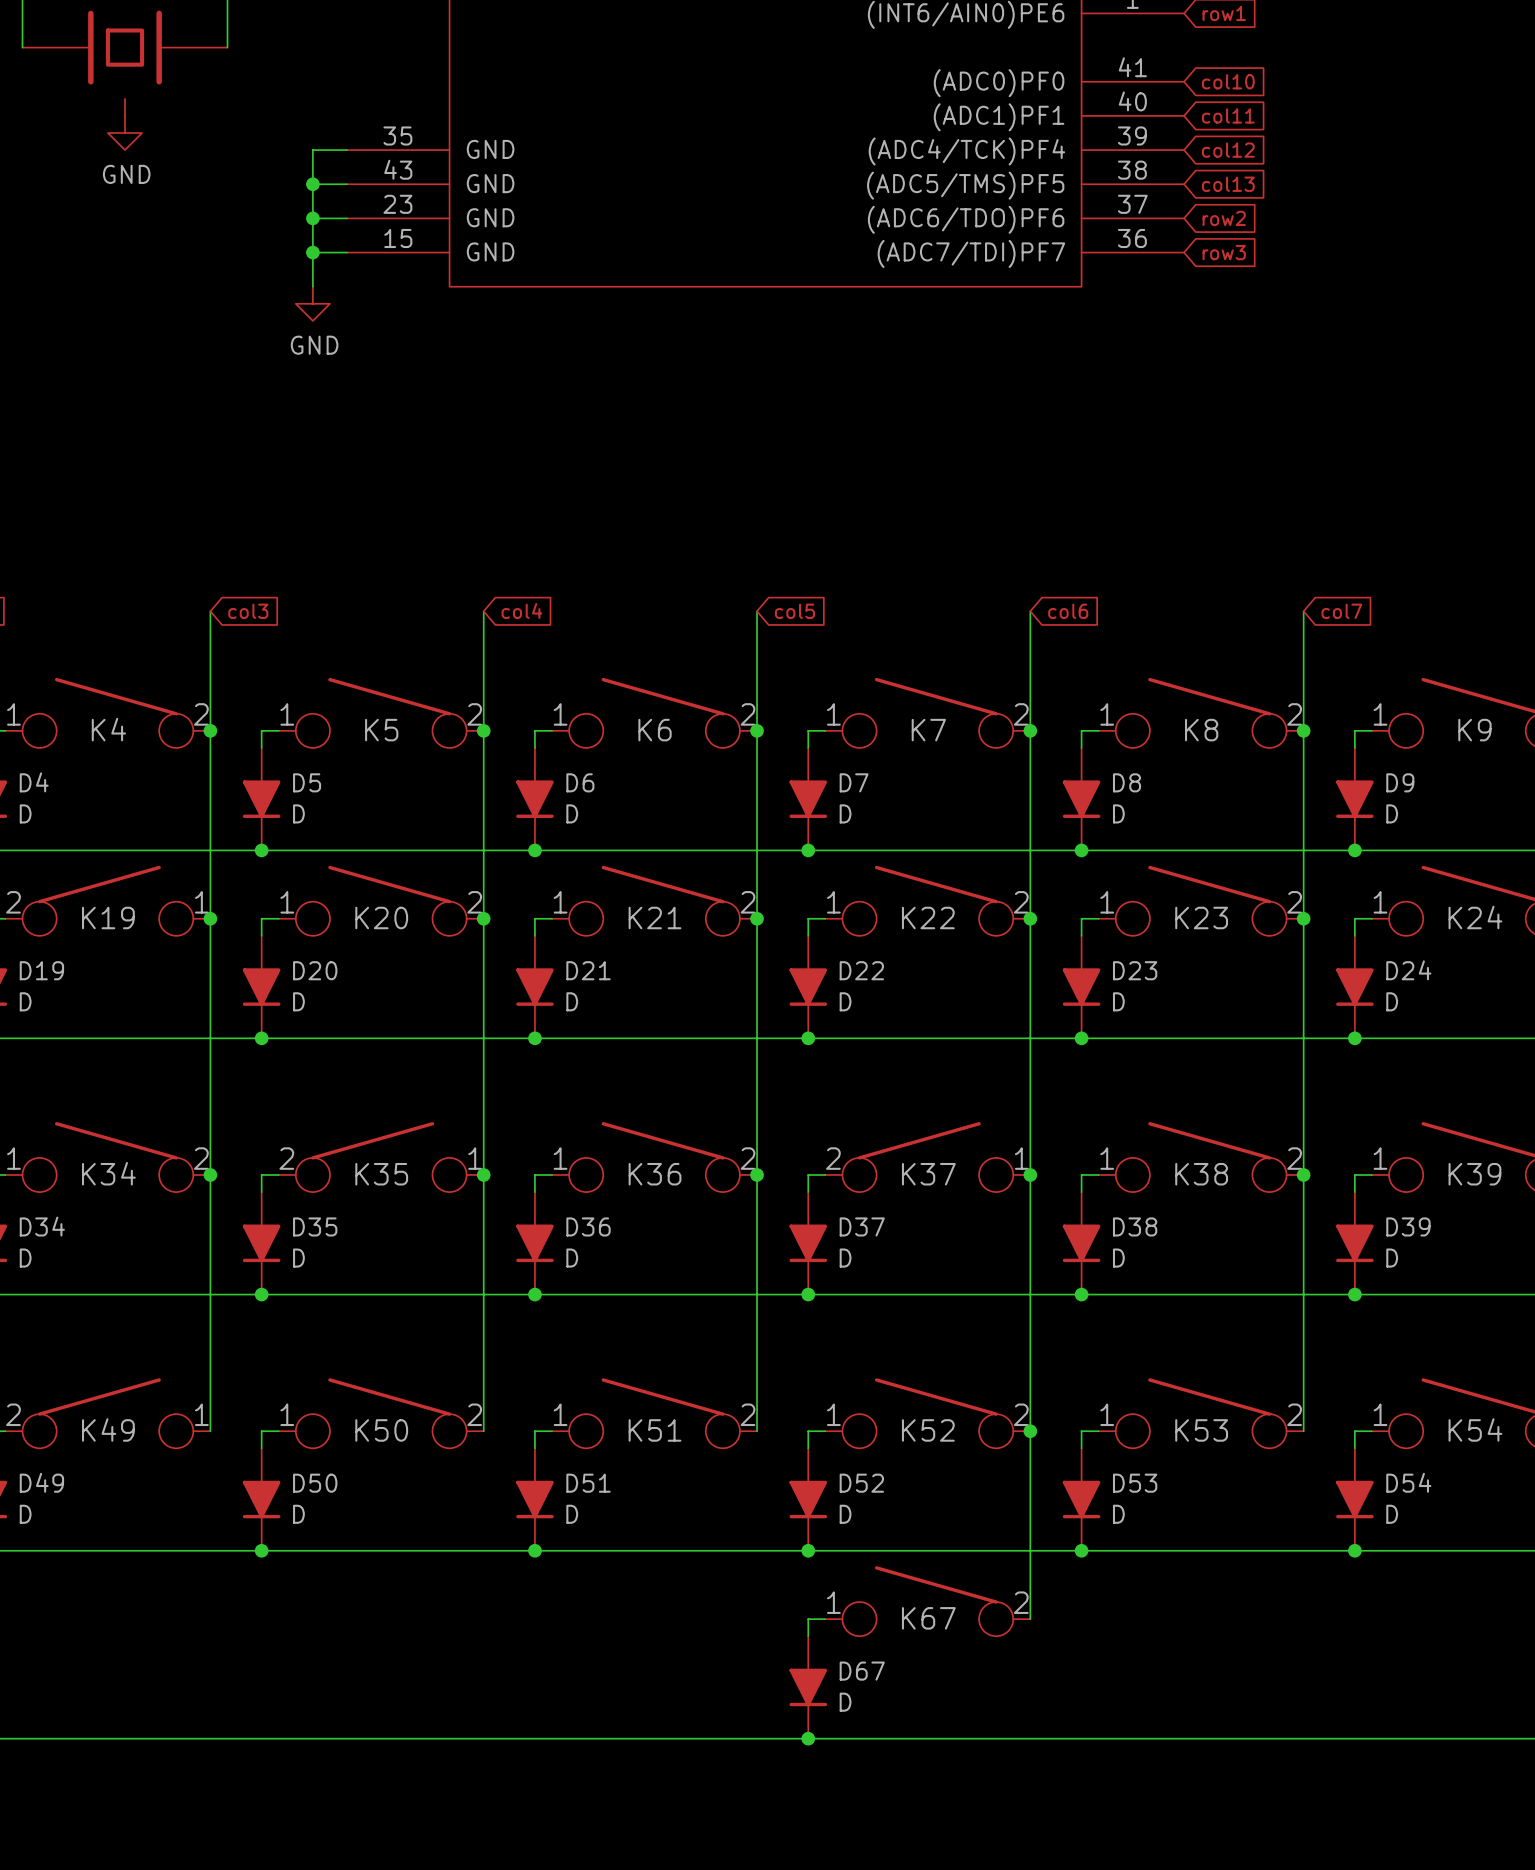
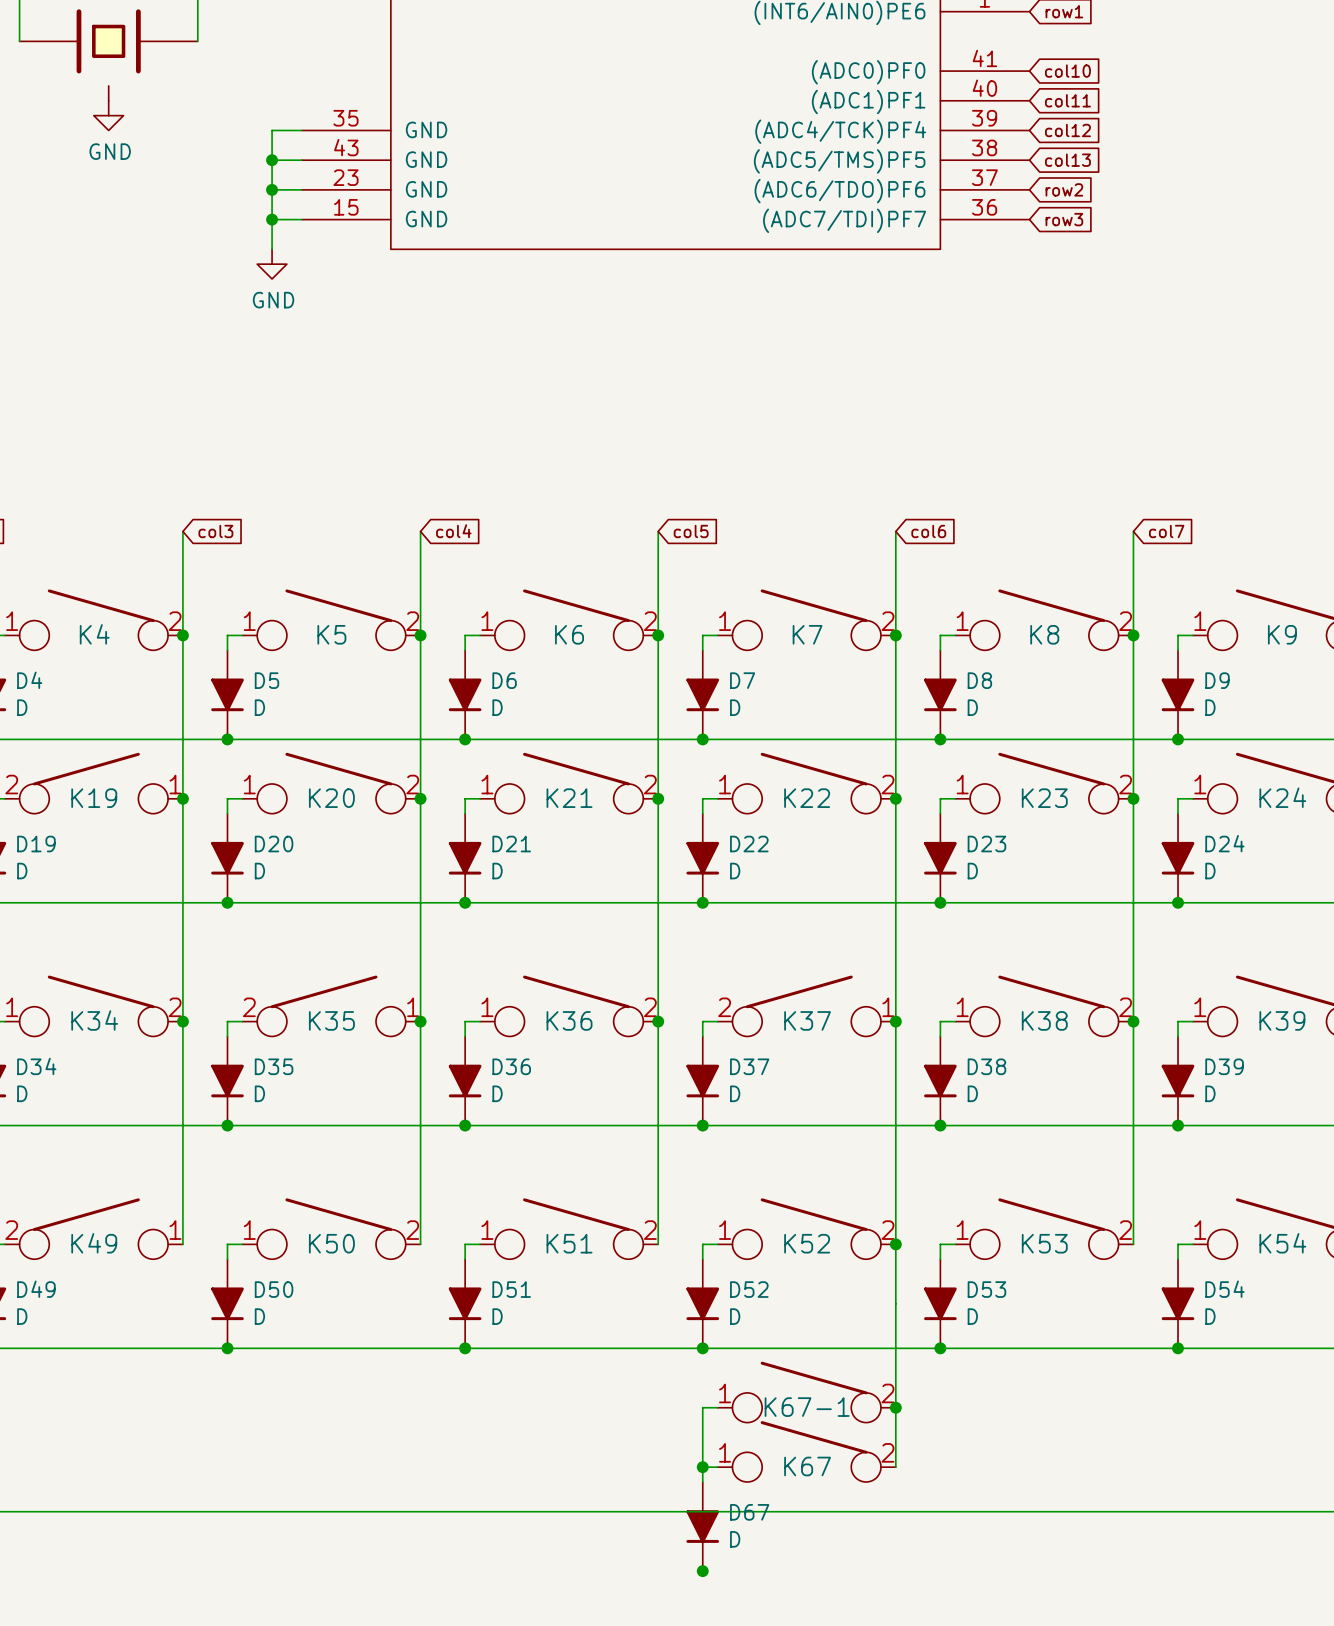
K67 name: K67 (928, 1618) -> K67-1 (807, 1407)
wire: none -> (895, 1407) (895, 1467)
junction: none -> (895, 1407)
K67: none -> (806, 1451)
junction: none -> (702, 1467)
D67 position: (808, 1687) -> (702, 1526)
junction: (808, 1738) -> none
junction: none -> (702, 1571)

